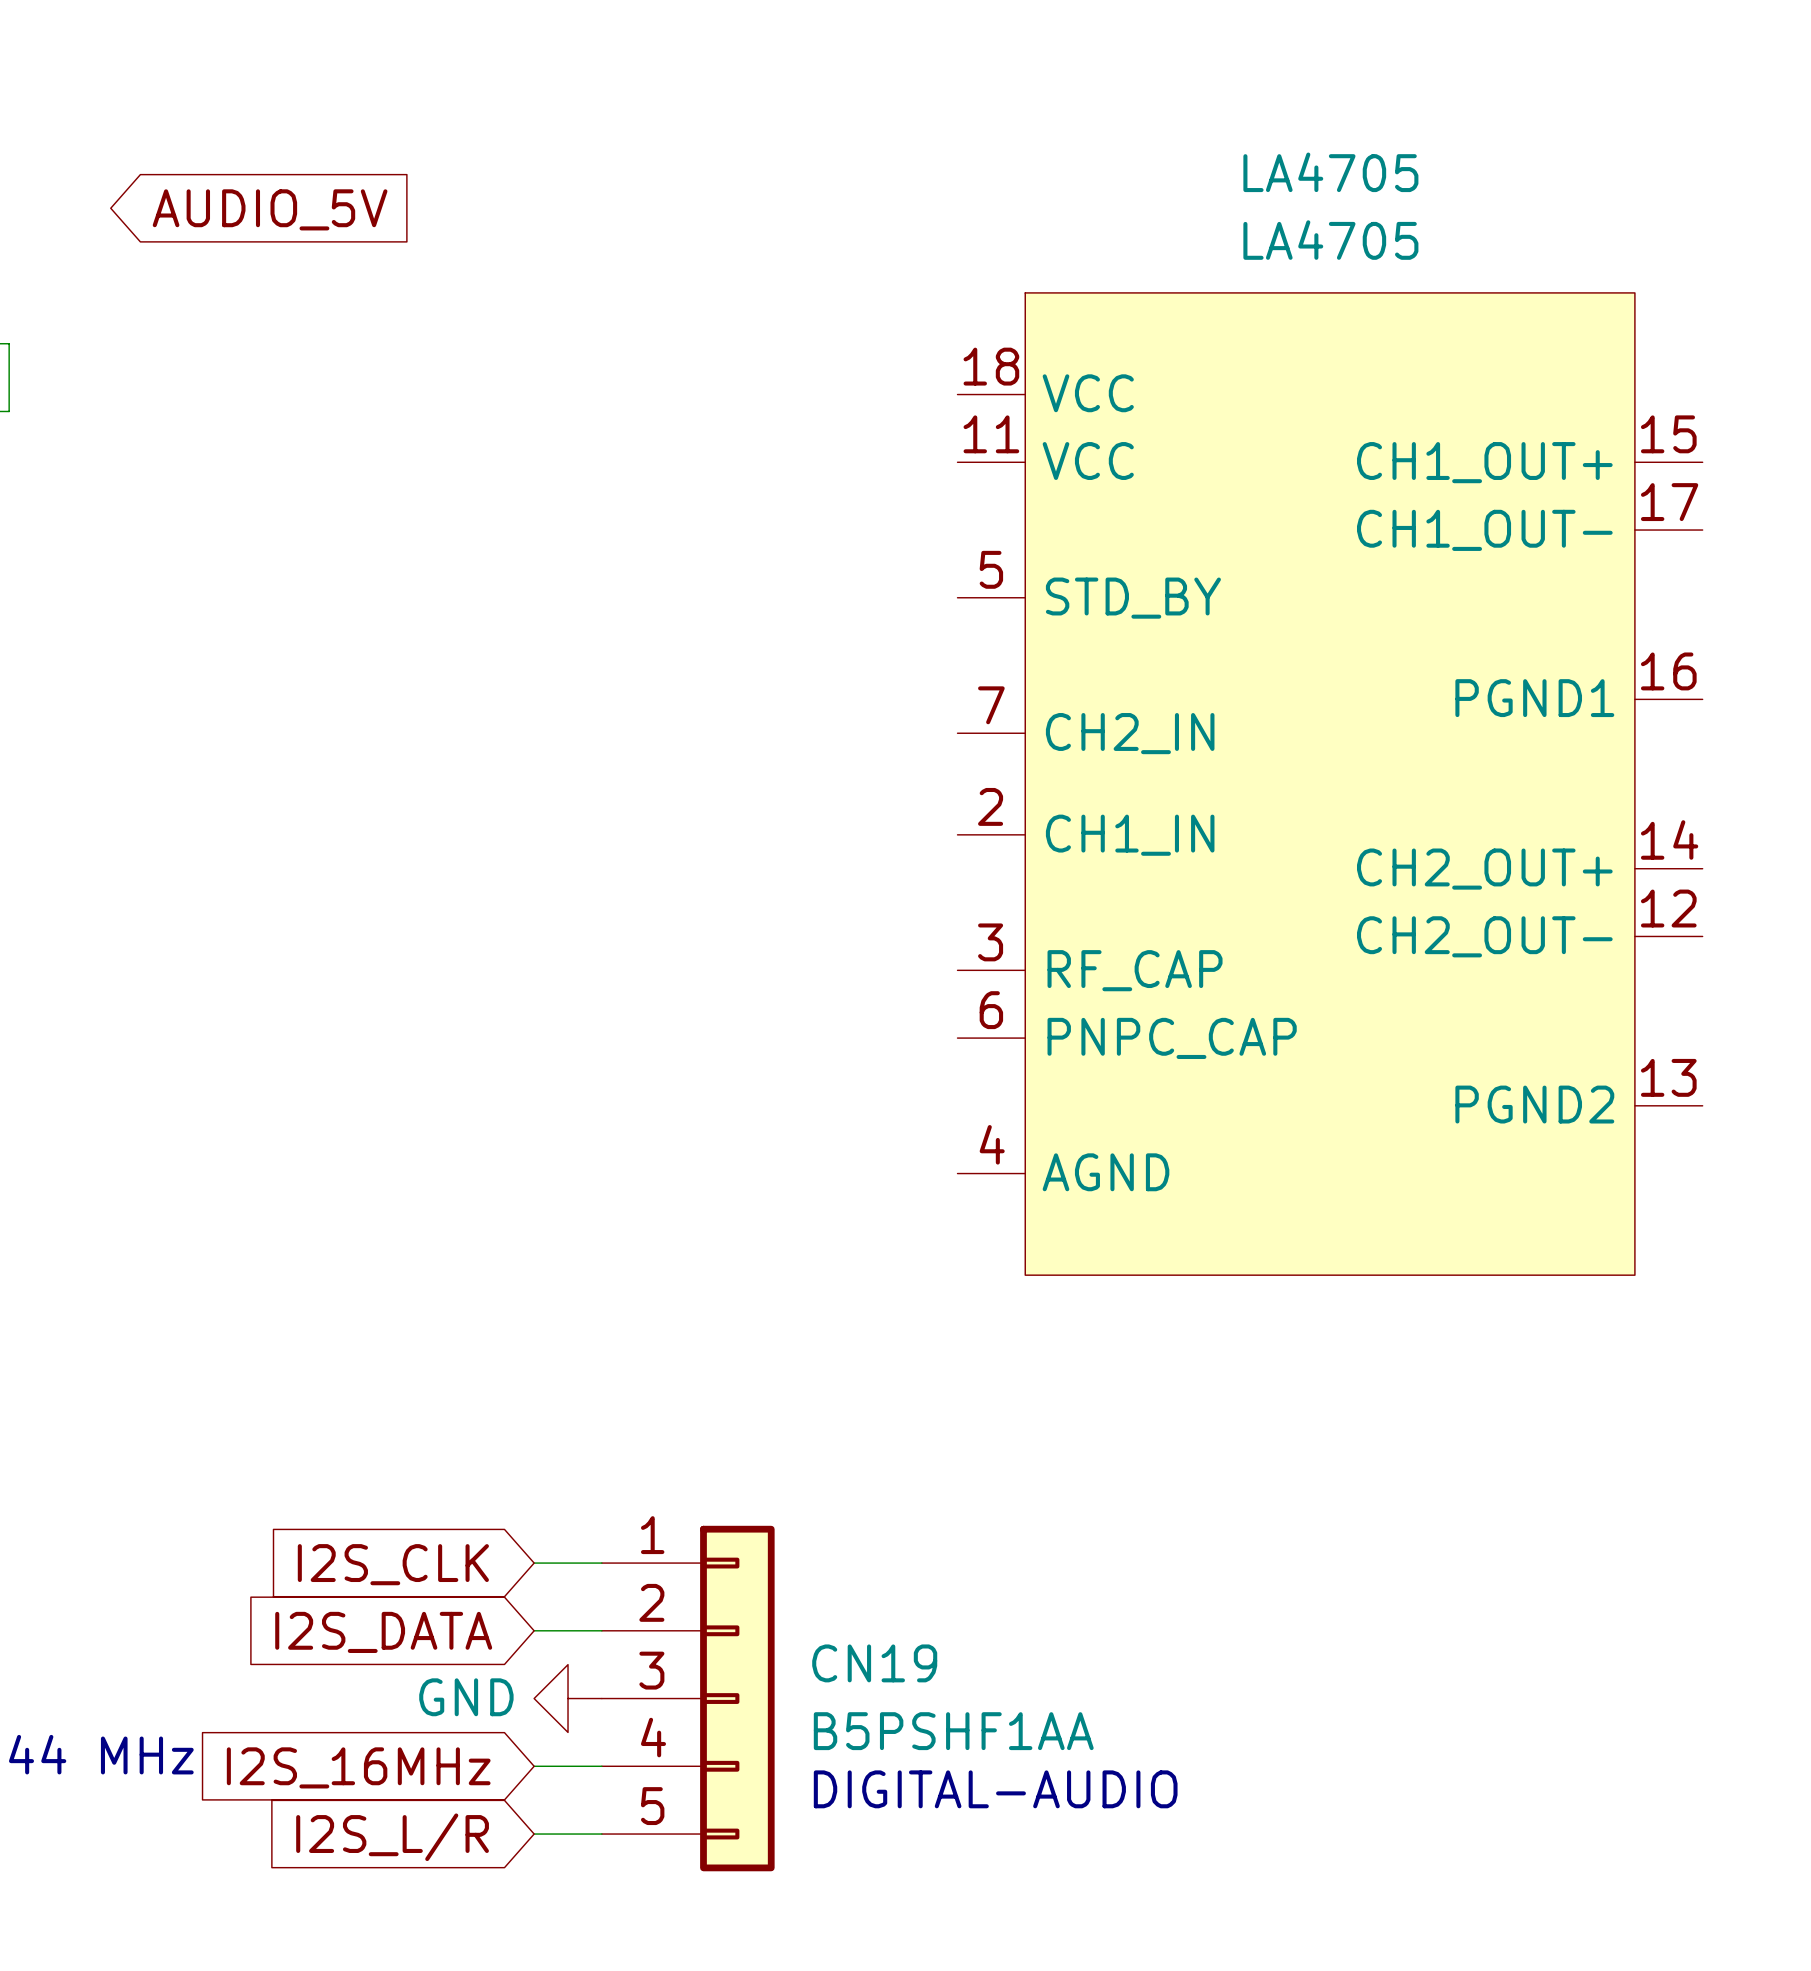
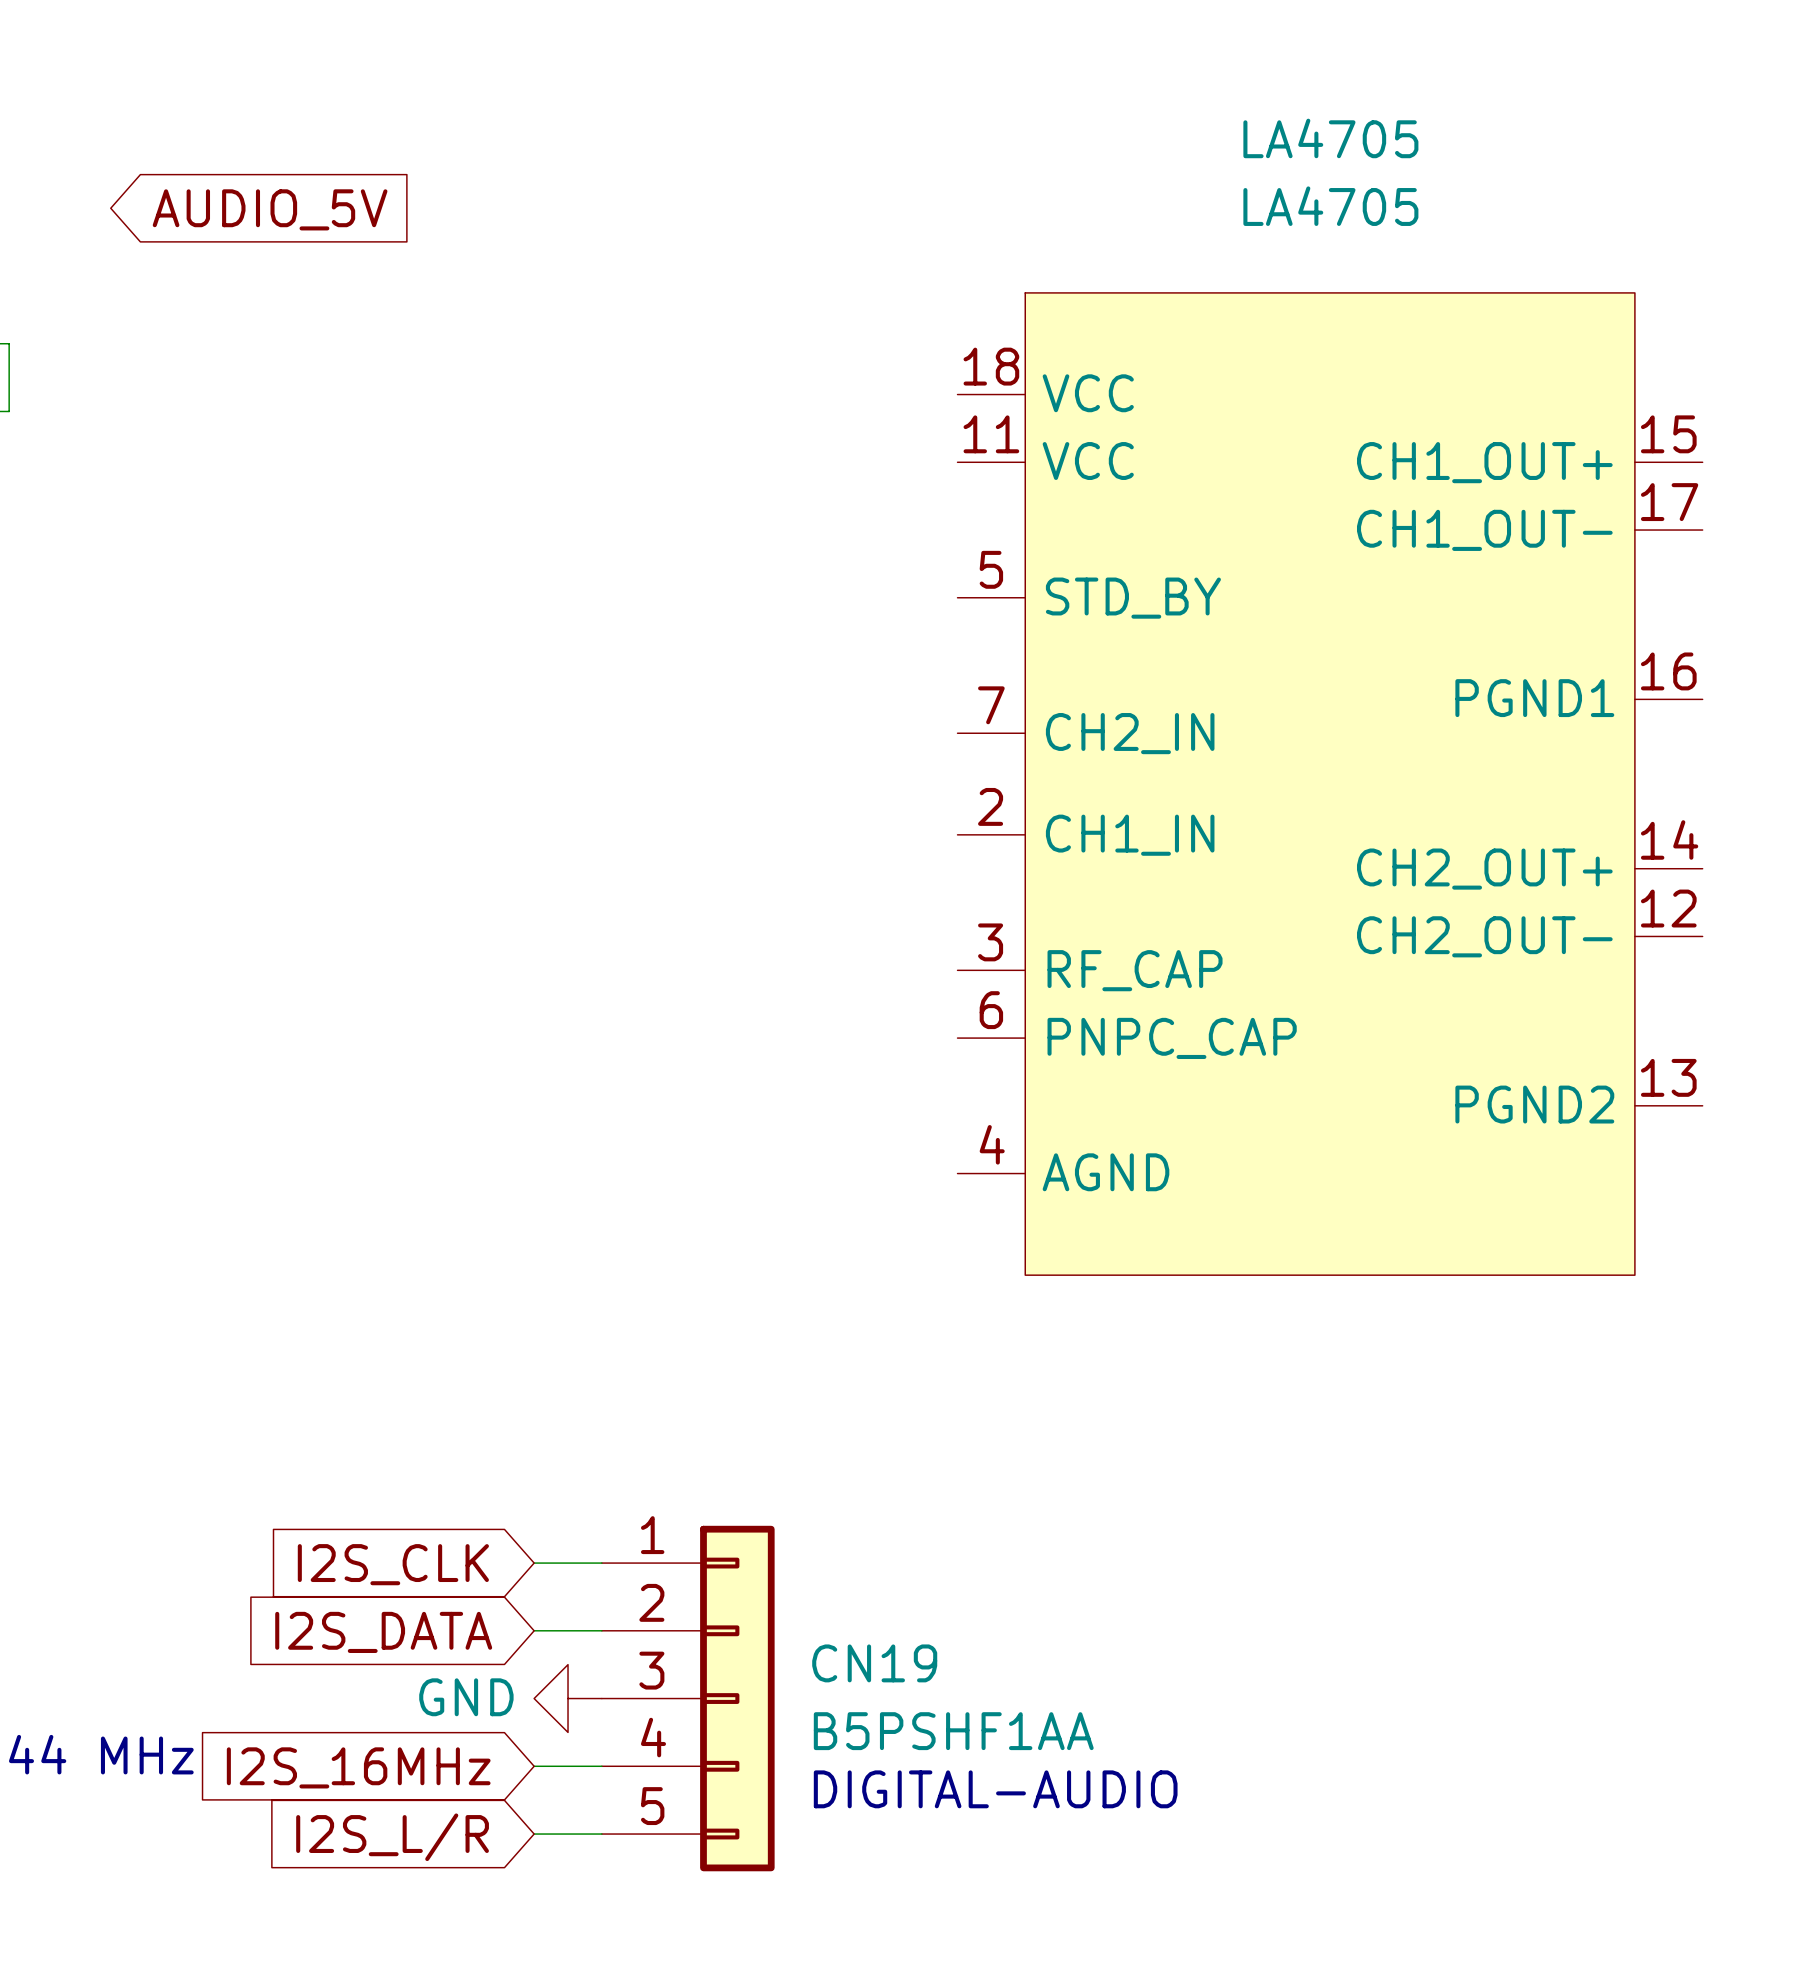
LA4705 name position: LA4705 (1330, 172) -> LA4705 (1330, 138)
LA4705 value position: LA4705 (1330, 240) -> LA4705 (1330, 206)

